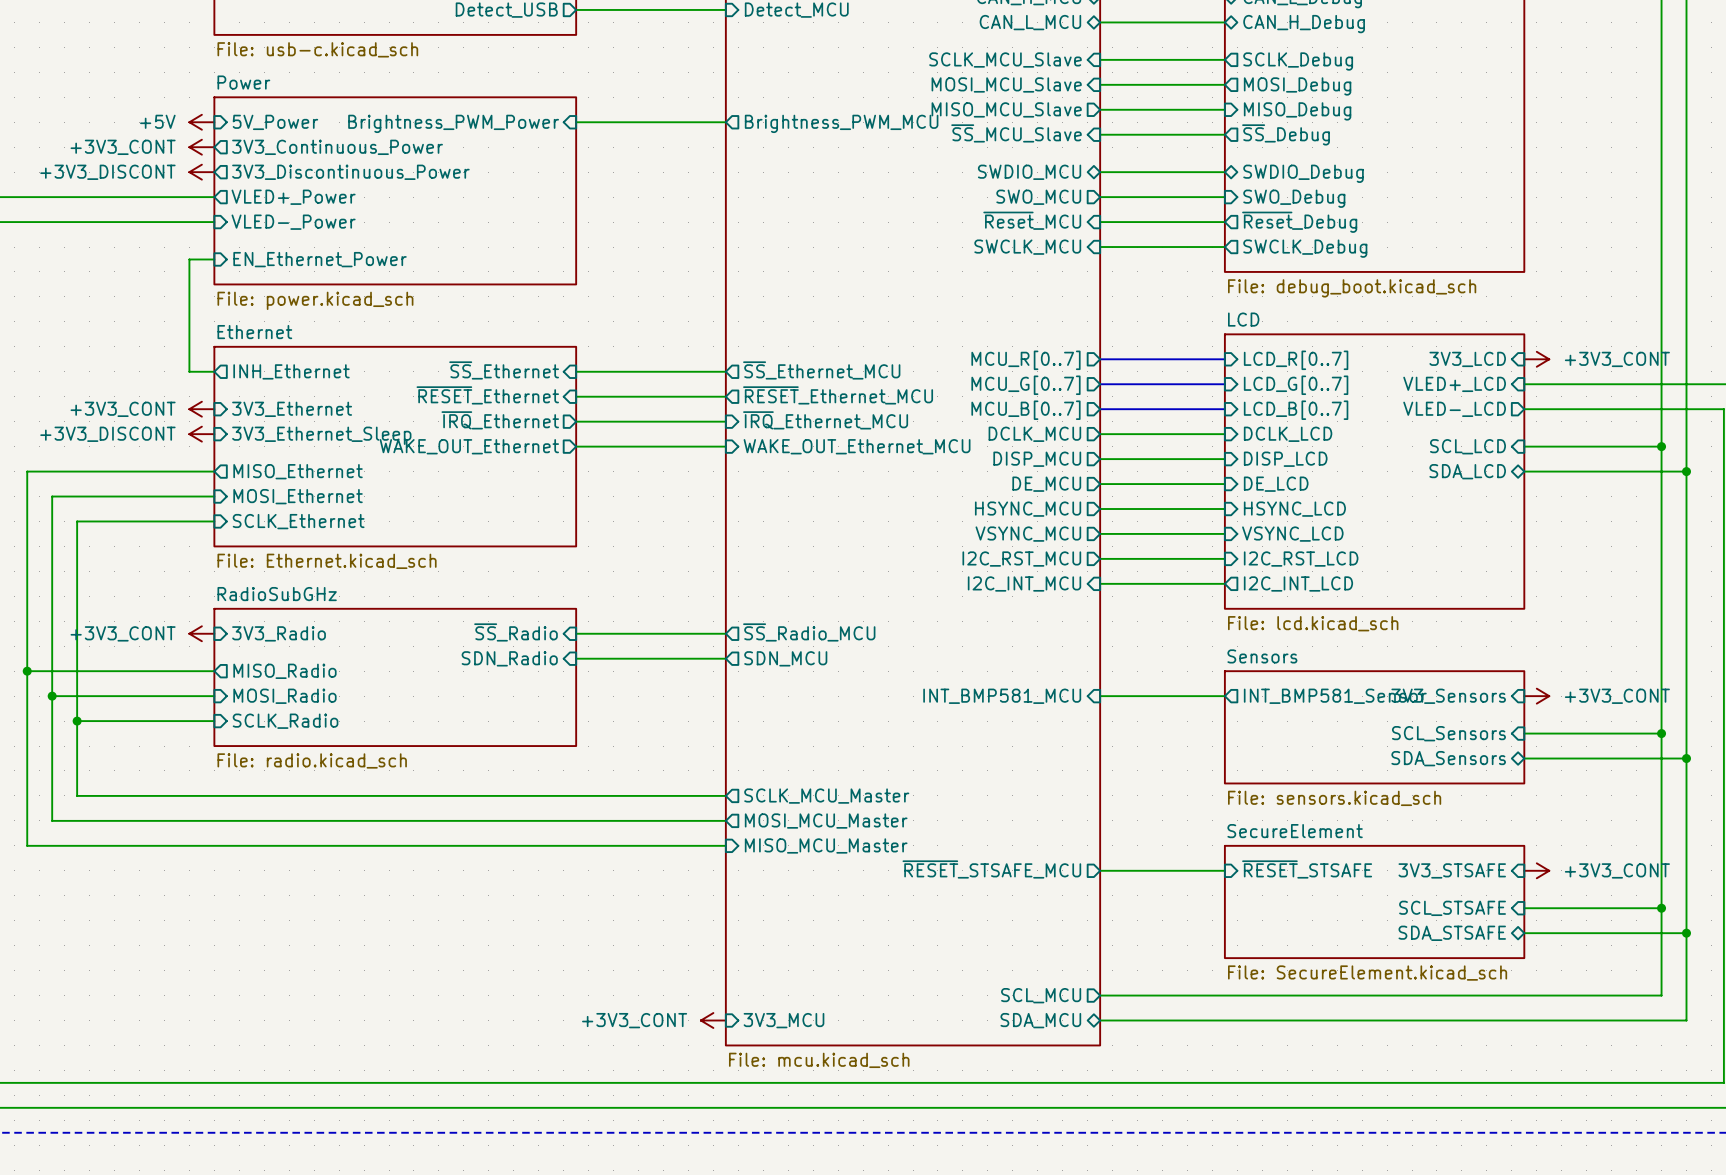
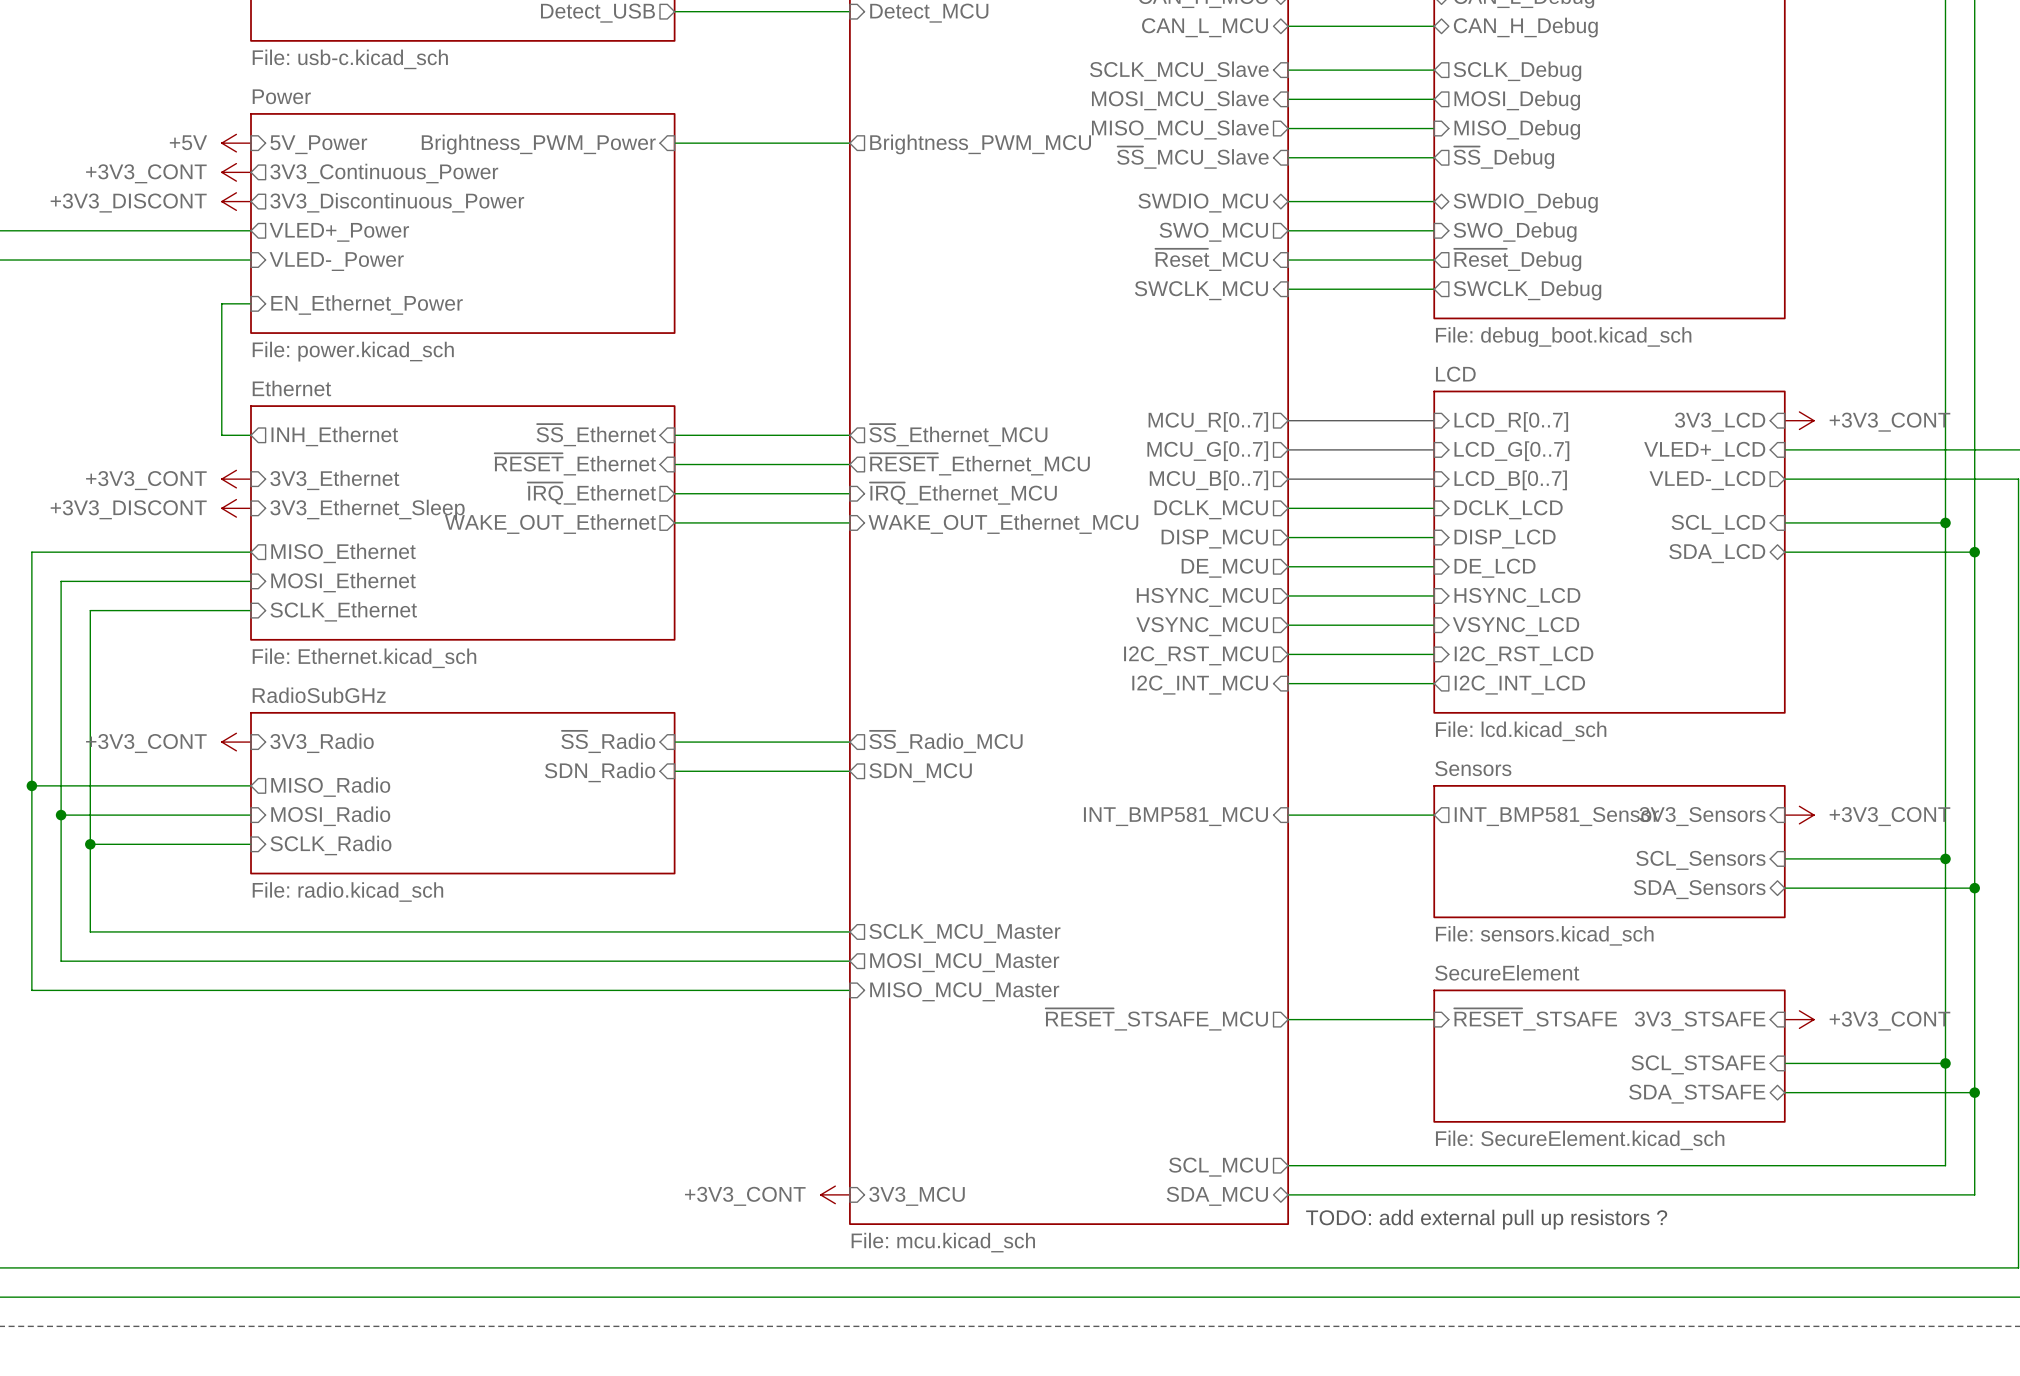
text: none -> TODO: add external pull up resistors ? (1486, 1219)

